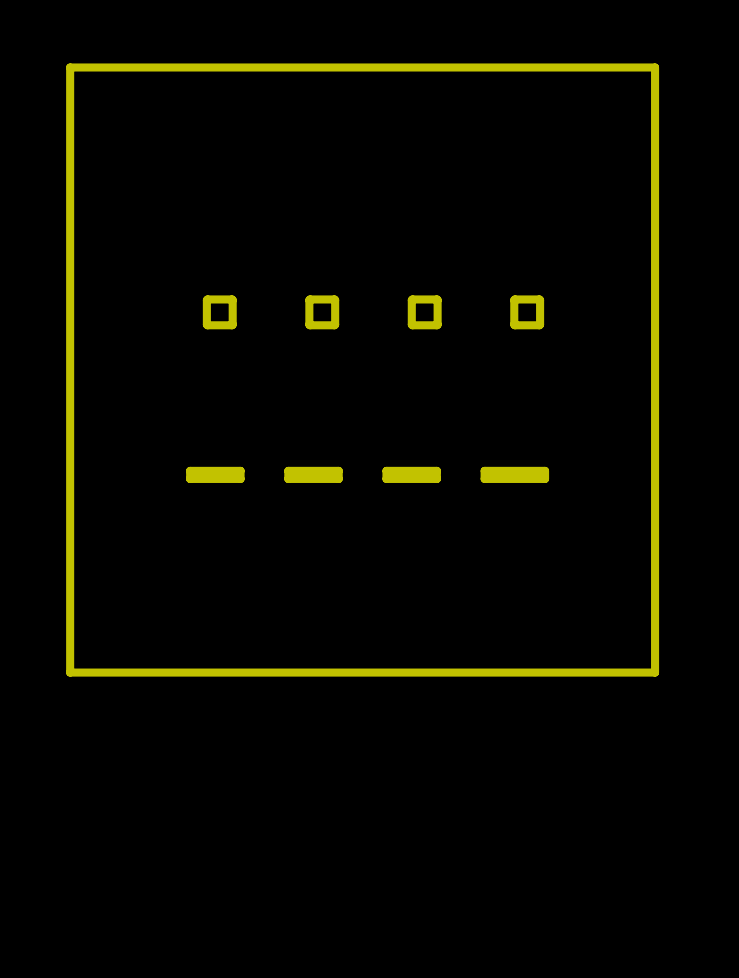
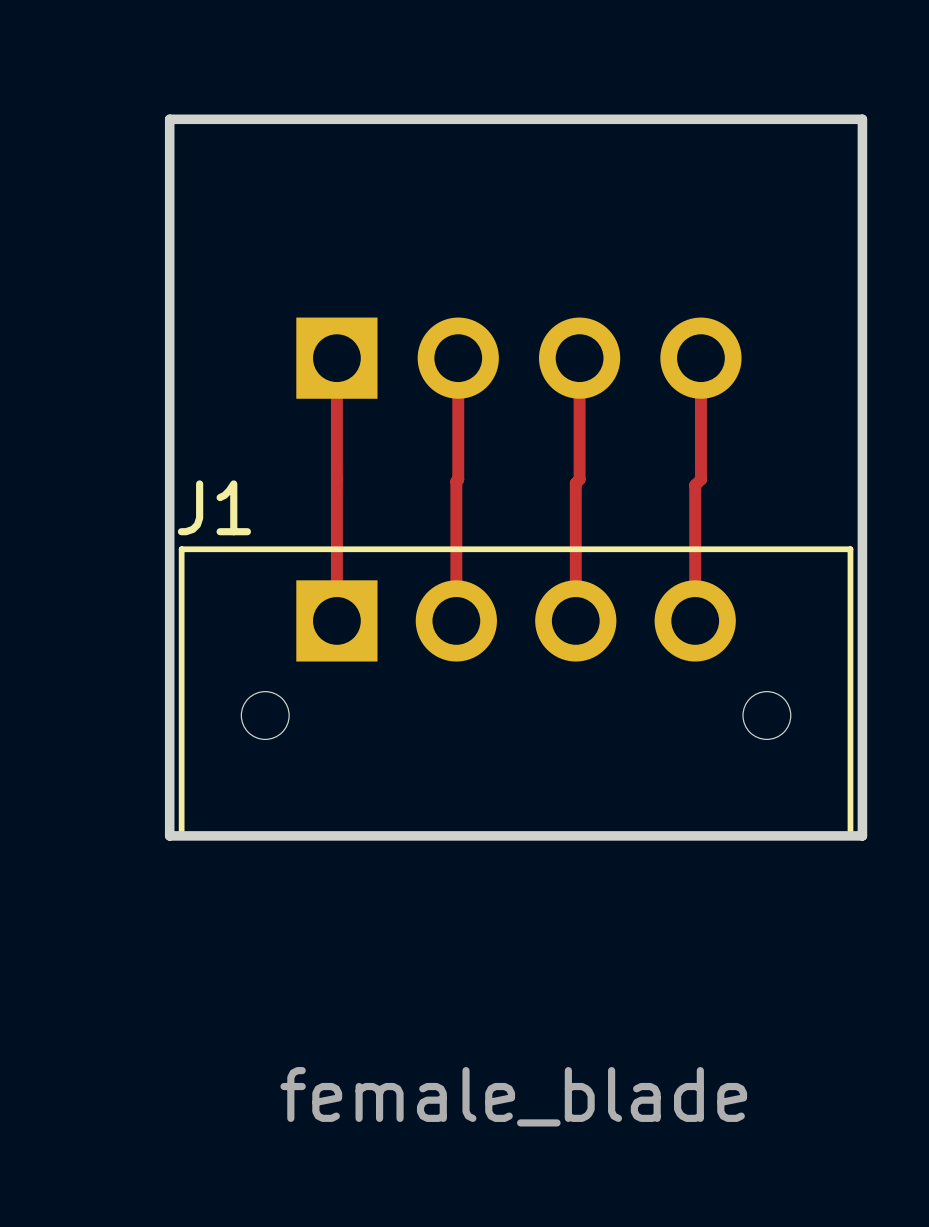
top track: none -> (336, 358) (336, 620)
top track: none -> (458, 358) (456, 620)
part: none -> (518, 358)
top track: none -> (579, 358) (579, 479) (575, 483) (575, 620)
top track: none -> (700, 358) (700, 479) (695, 485) (695, 620)
board edge: (207, 299) (232, 299) (232, 325) (207, 325) (207, 299) -> none
board edge: (310, 299) (334, 299) (334, 325) (309, 325) (310, 299) -> none
board edge: (412, 299) (437, 299) (437, 325) (412, 325) (412, 299) -> none
board edge: (515, 299) (539, 299) (539, 325) (514, 325) (515, 299) -> none
board edge: (190, 470) (240, 470) (240, 478) (190, 478) (190, 470) -> none
board edge: (288, 470) (338, 470) (338, 478) (288, 478) (288, 470) -> none
board edge: (386, 470) (436, 470) (436, 478) (386, 478) (386, 470) -> none
board edge: (484, 470) (545, 470) (545, 478) (484, 478) (484, 470) -> none
J1: none -> female_blade (516, 692)

